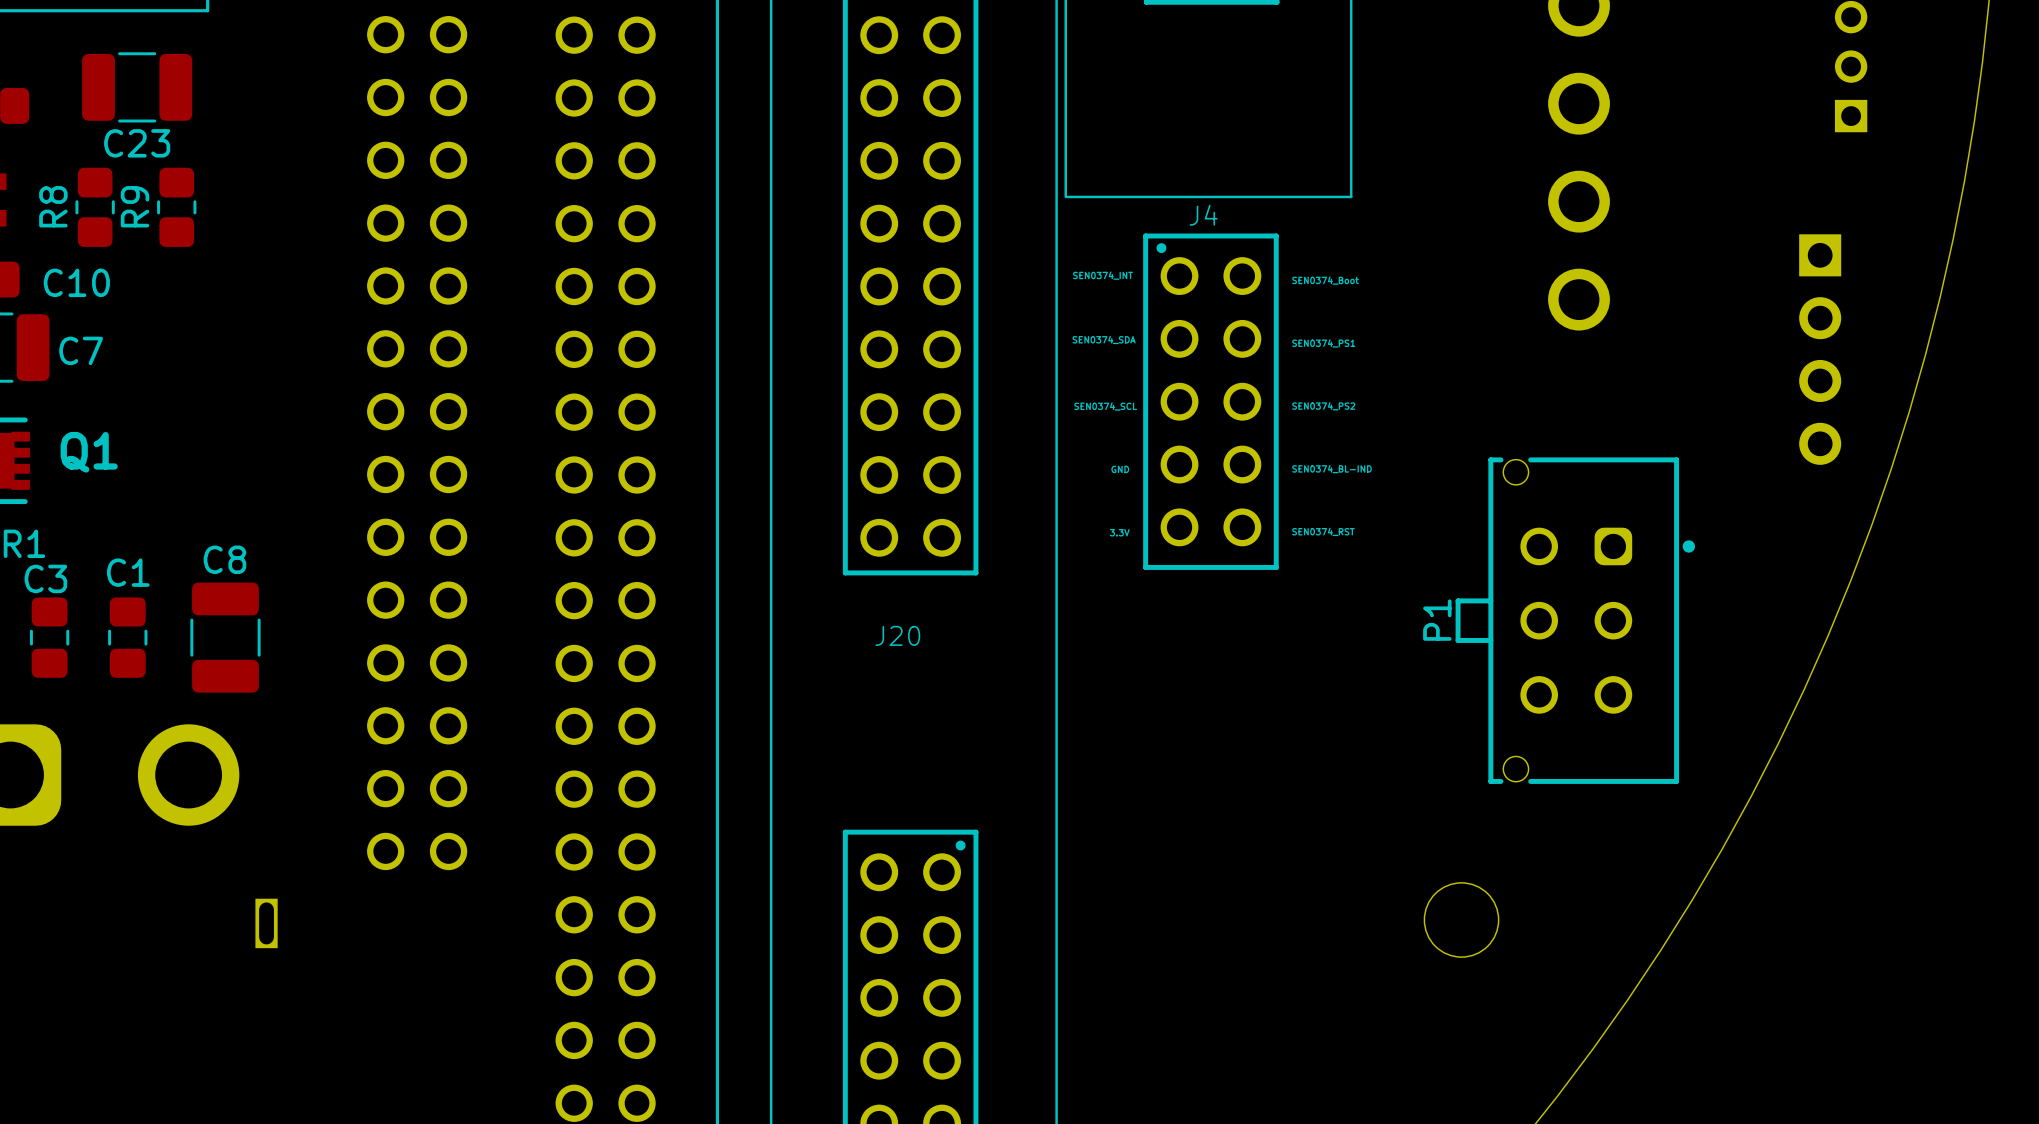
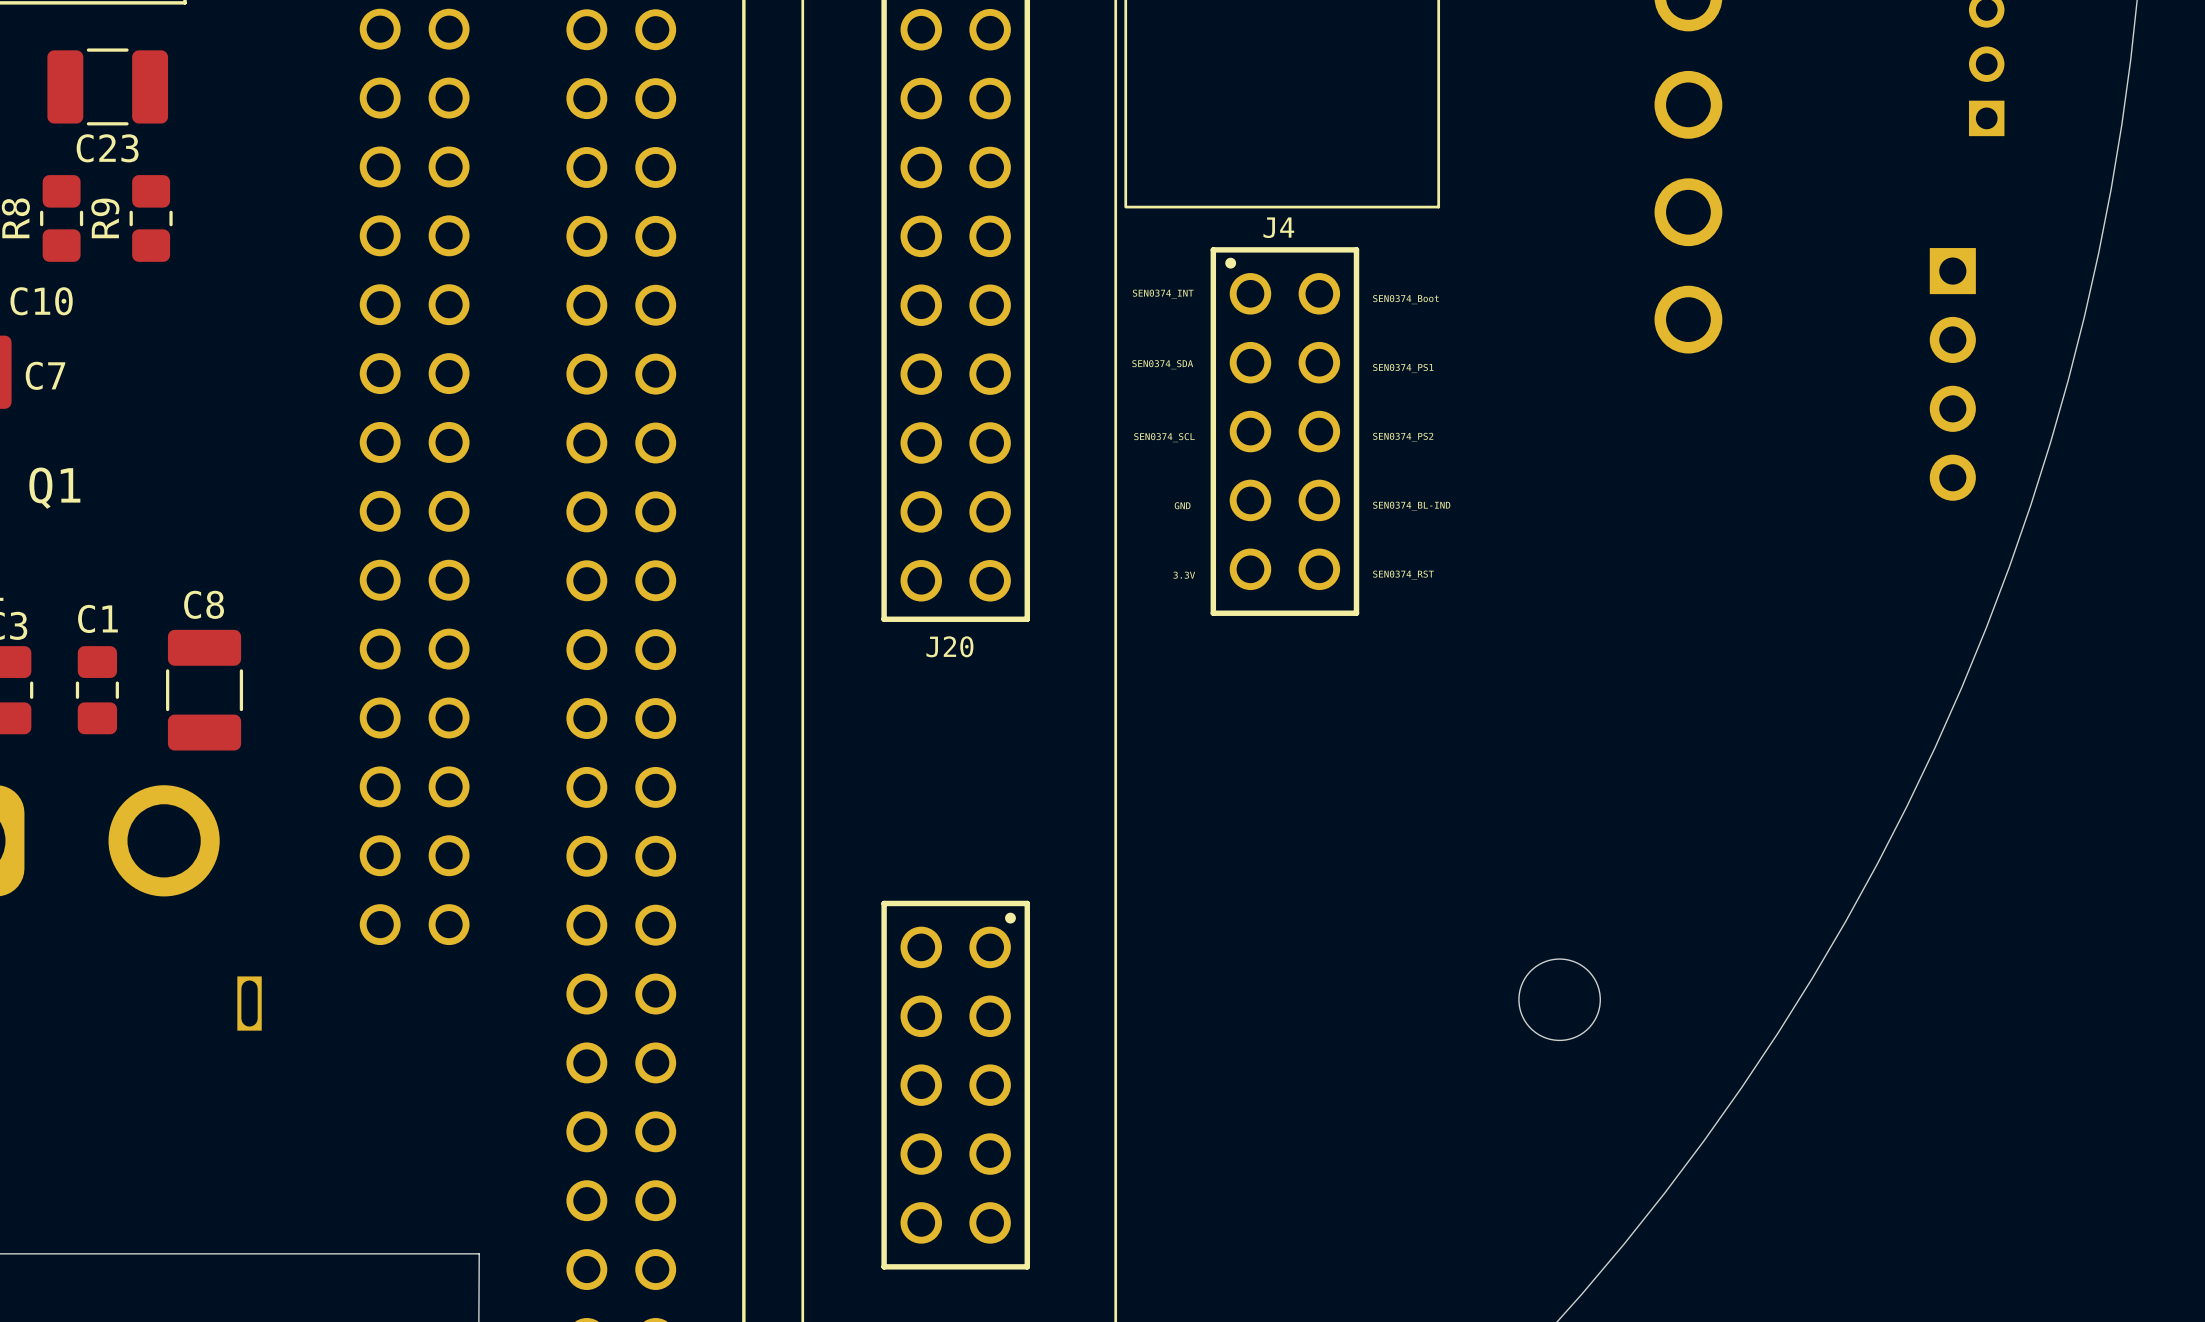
P1: (1575, 620) -> none
J20 name position: J20 (897, 635) -> J20 (949, 646)

